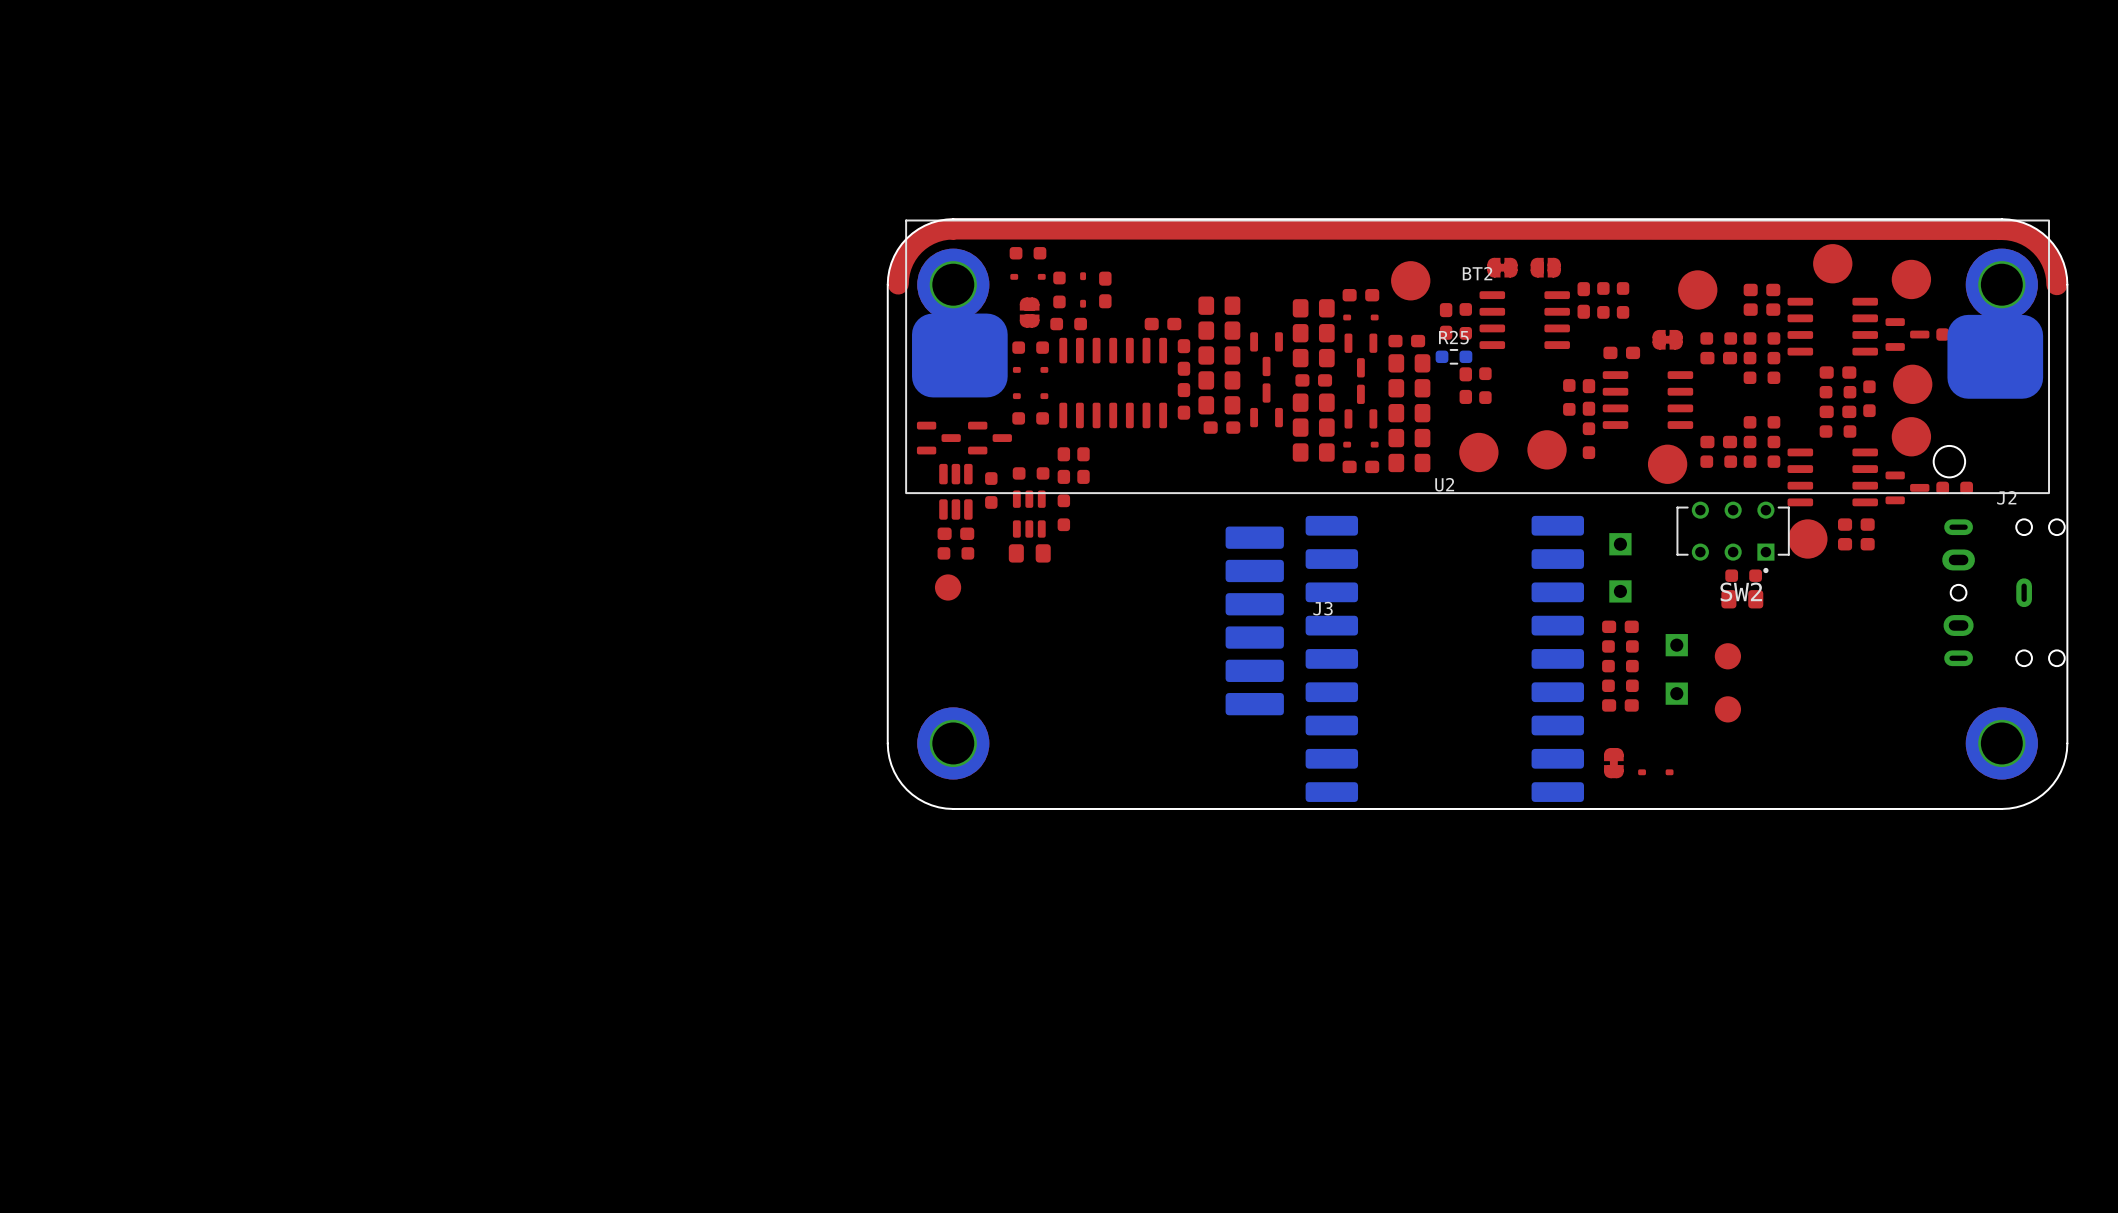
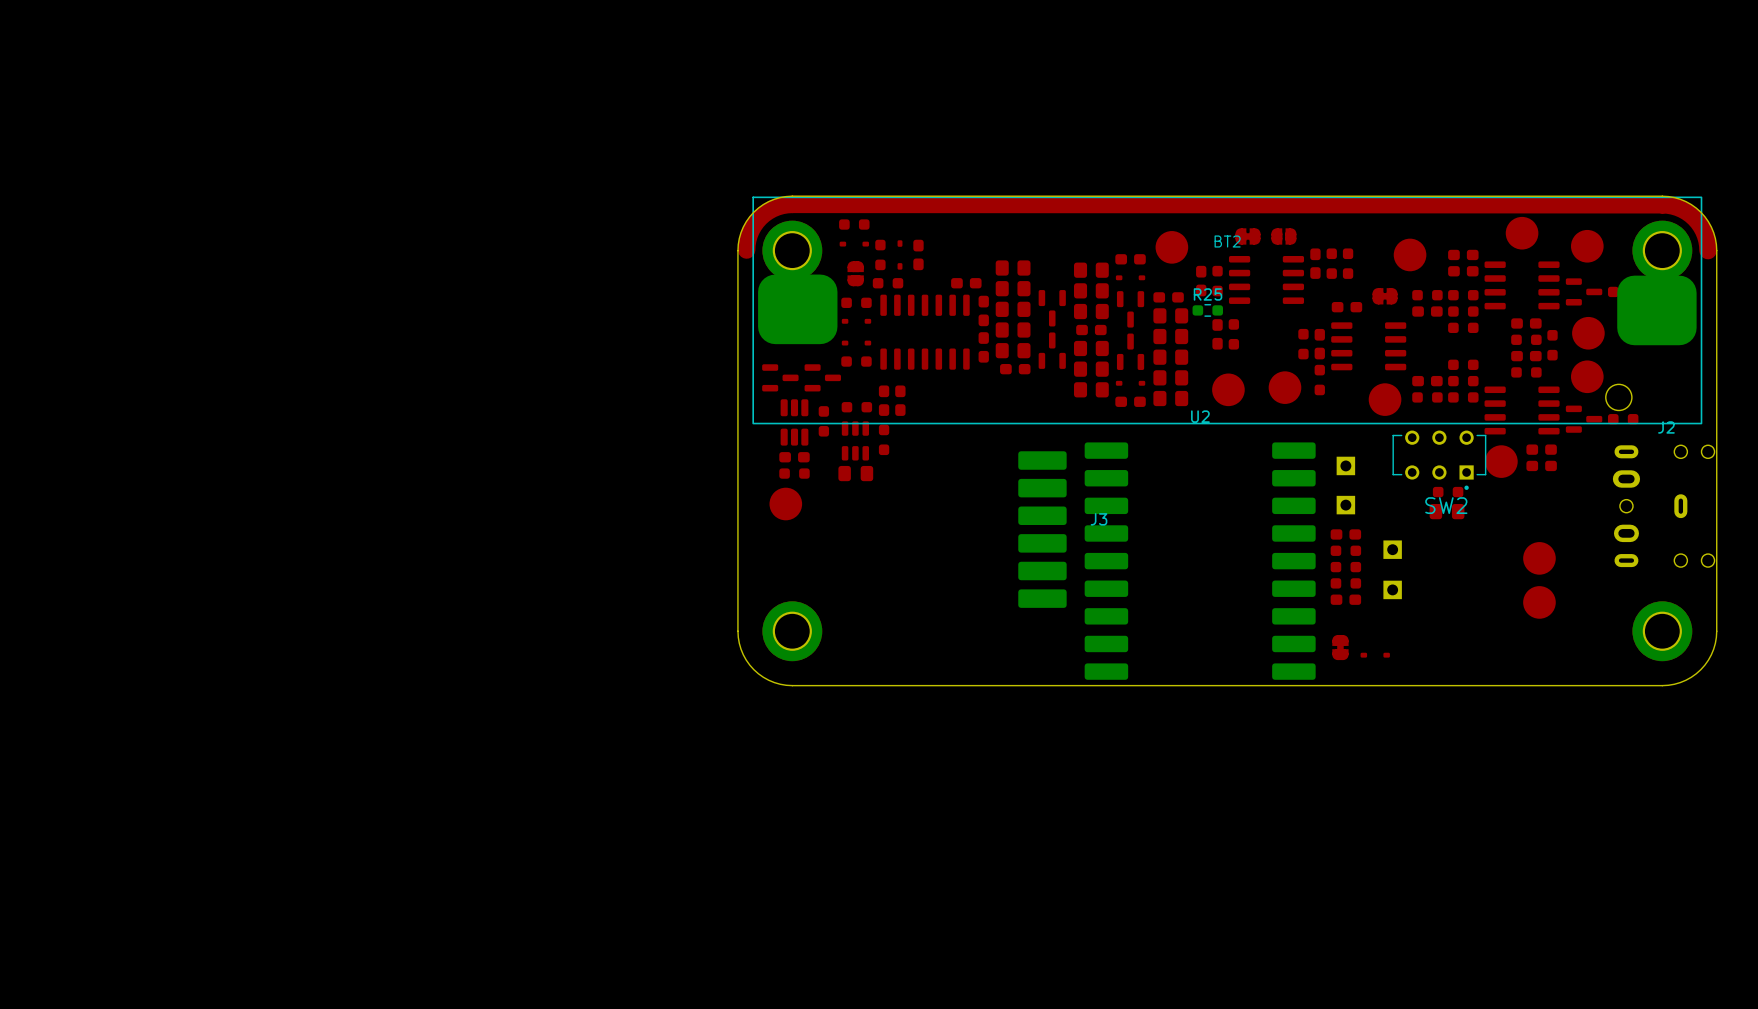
part footprint: [934, 574, 962, 601] -> [769, 487, 803, 521]
part: none -> (1539, 558)
part: (1727, 656) -> none
part: none -> (1539, 602)
part: (1727, 709) -> none

